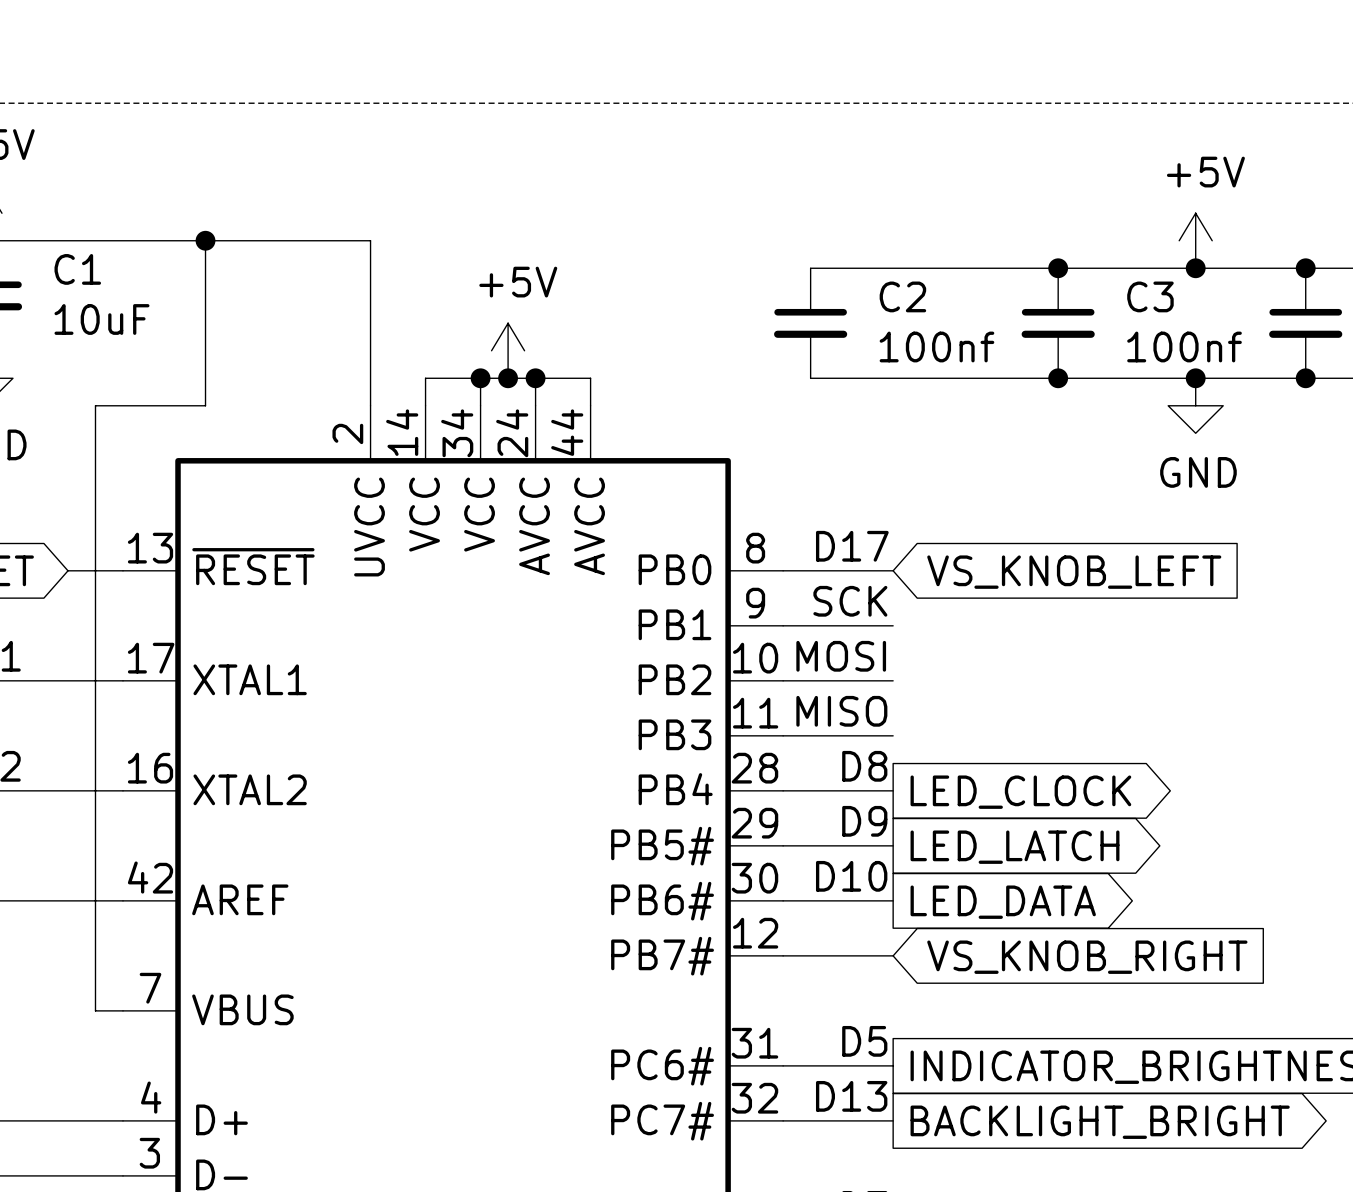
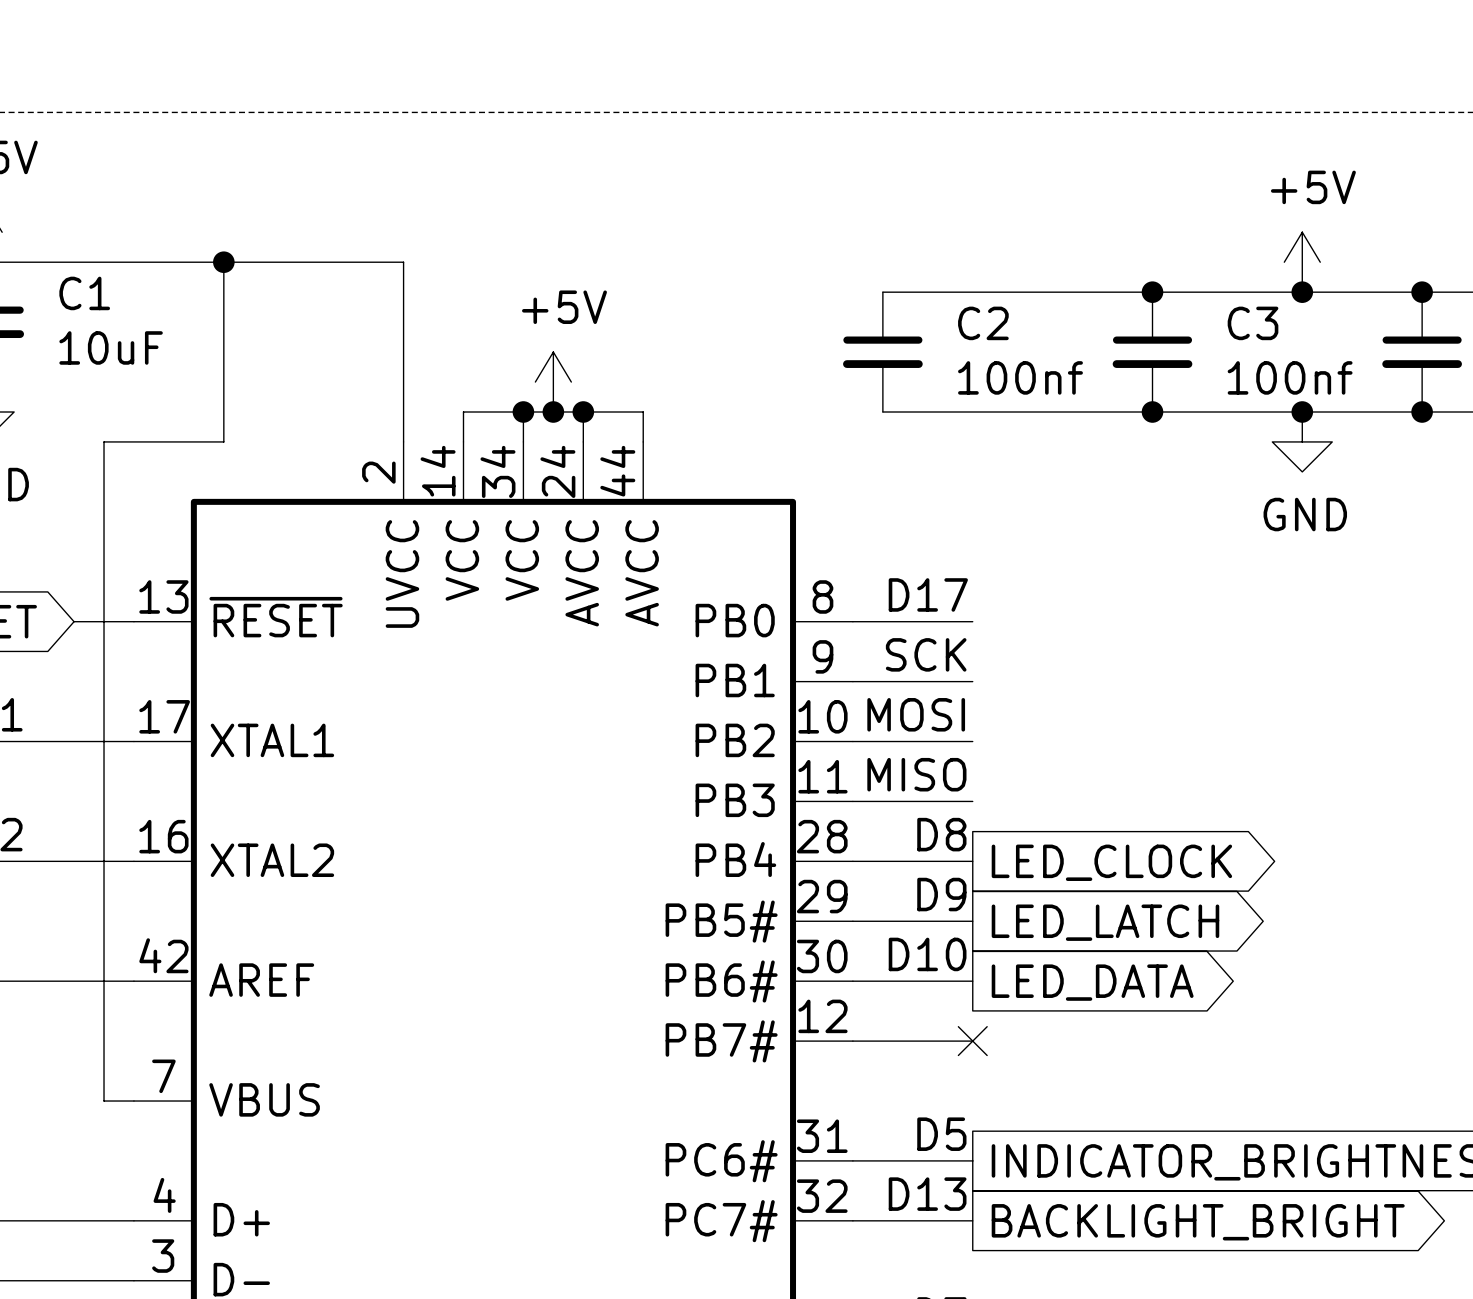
global label: VS_KNOB_LEFT (1074, 572) -> none
no-connect mark: none -> (972, 1041)
global label: VS_KNOB_RIGHT (1087, 957) -> none

